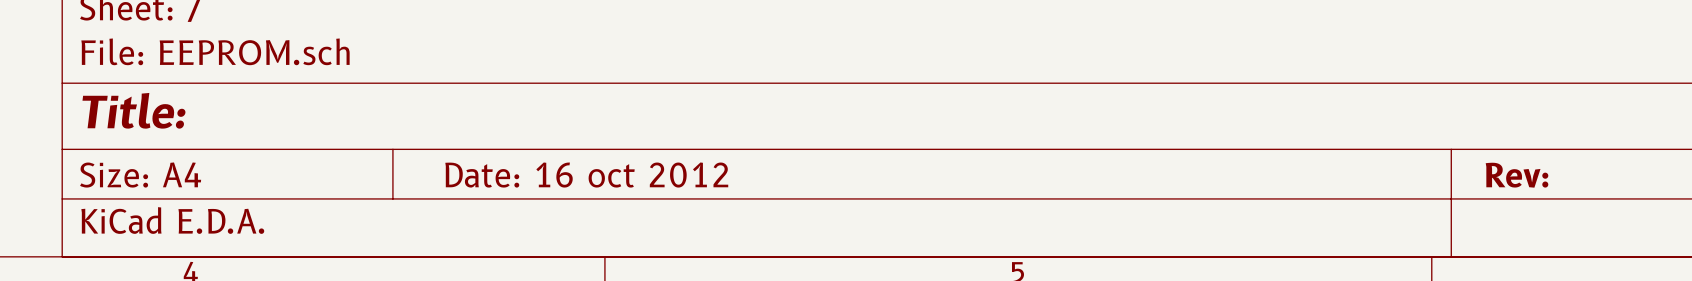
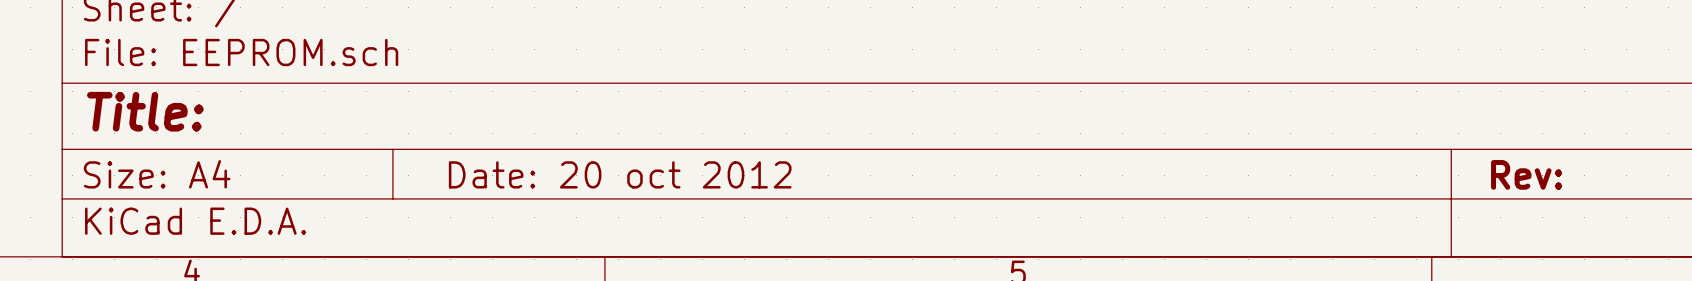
title block: Date: 16 oct 2012 (586, 175) -> Date: 20 oct 2012 (620, 174)

